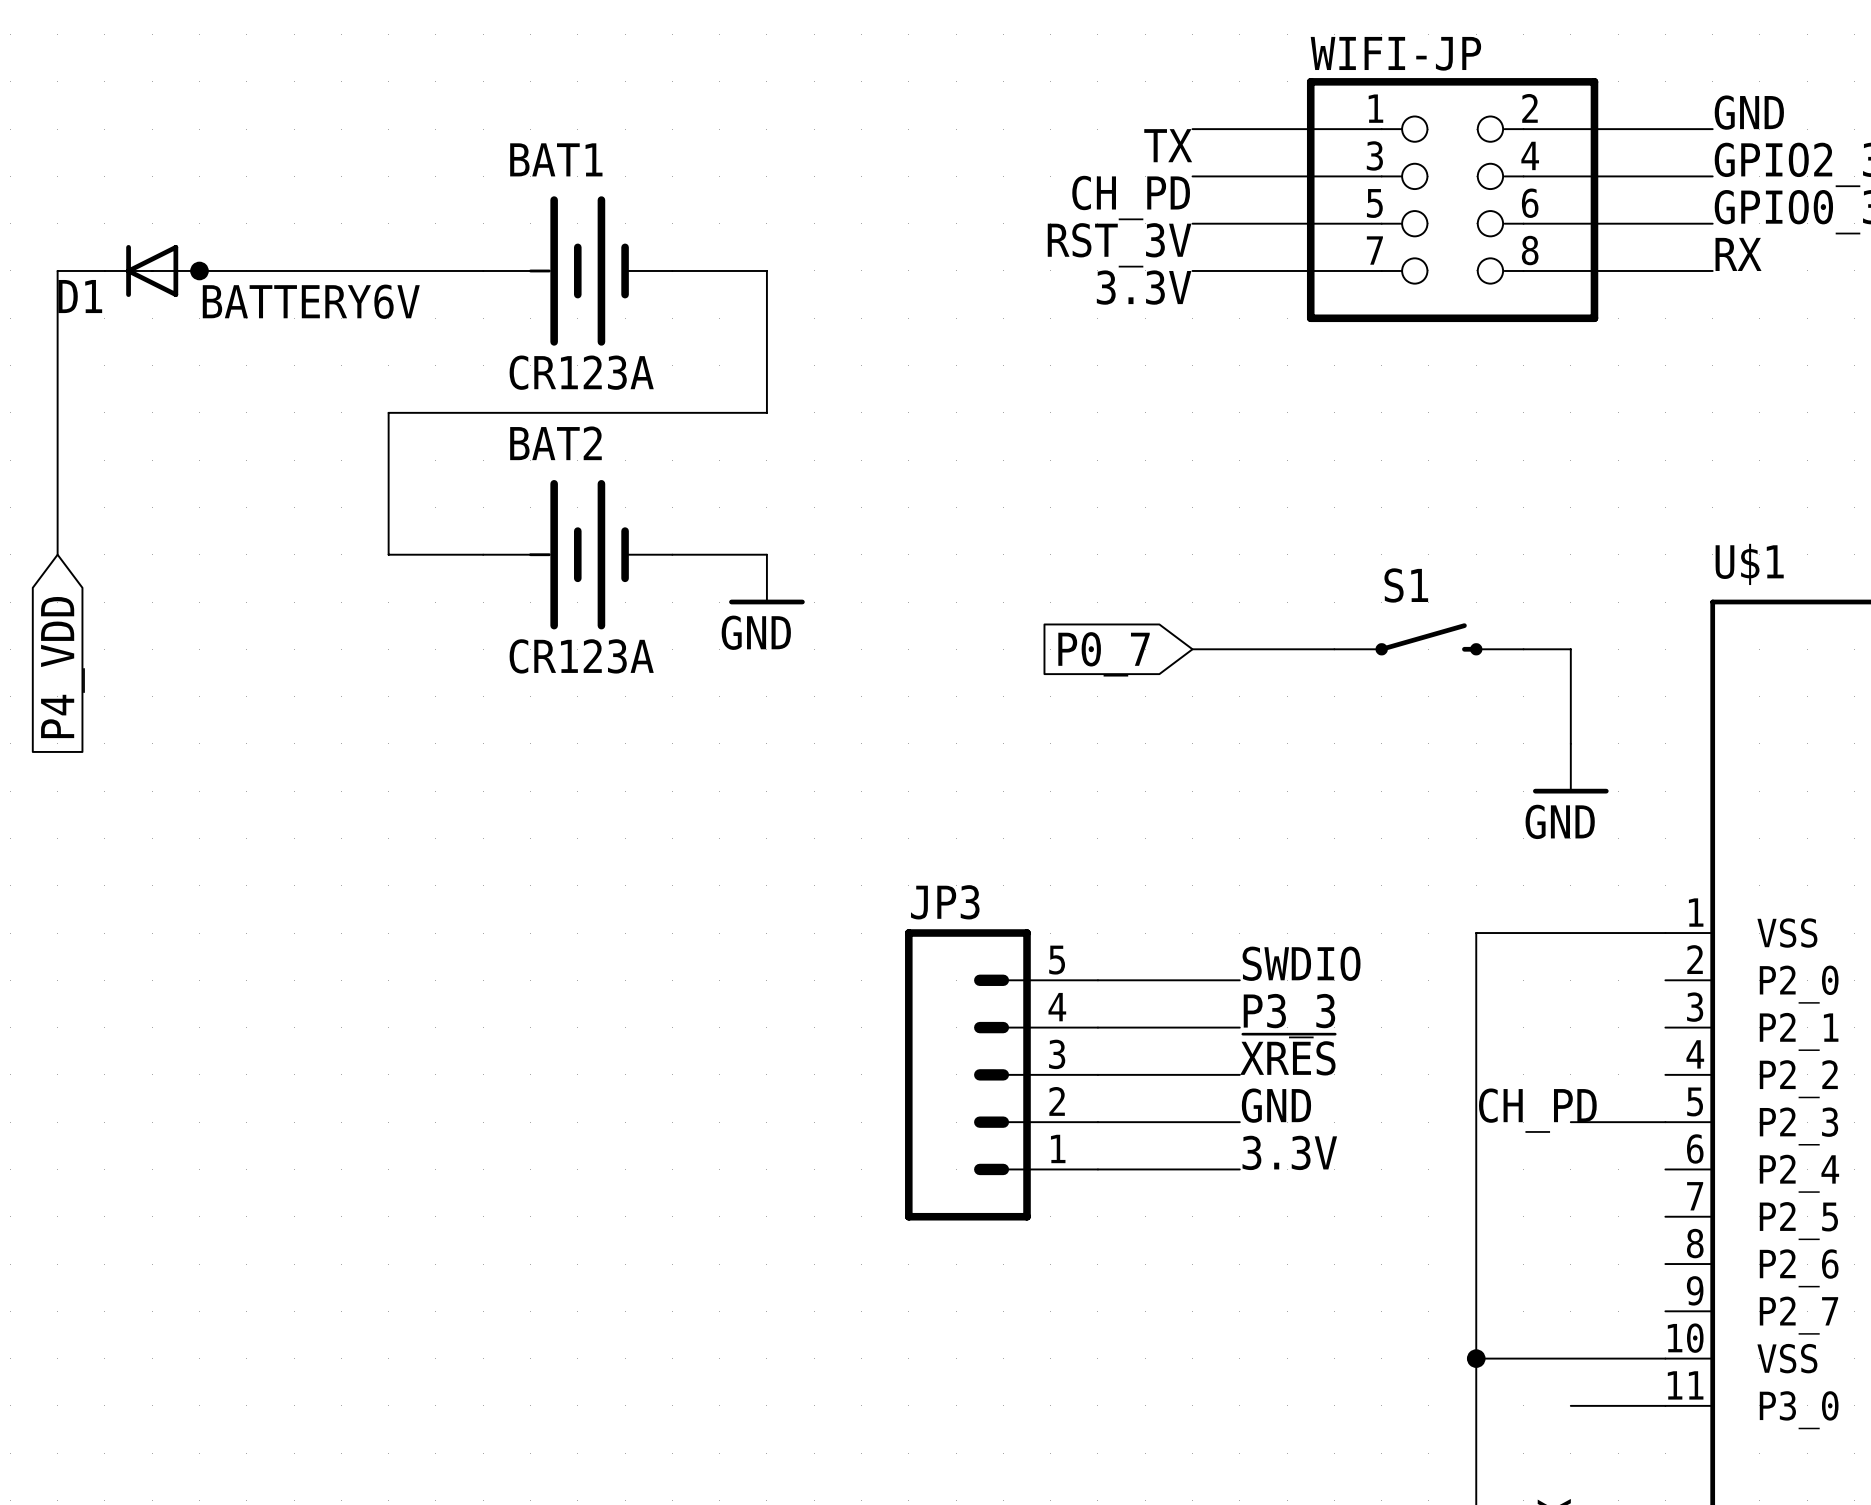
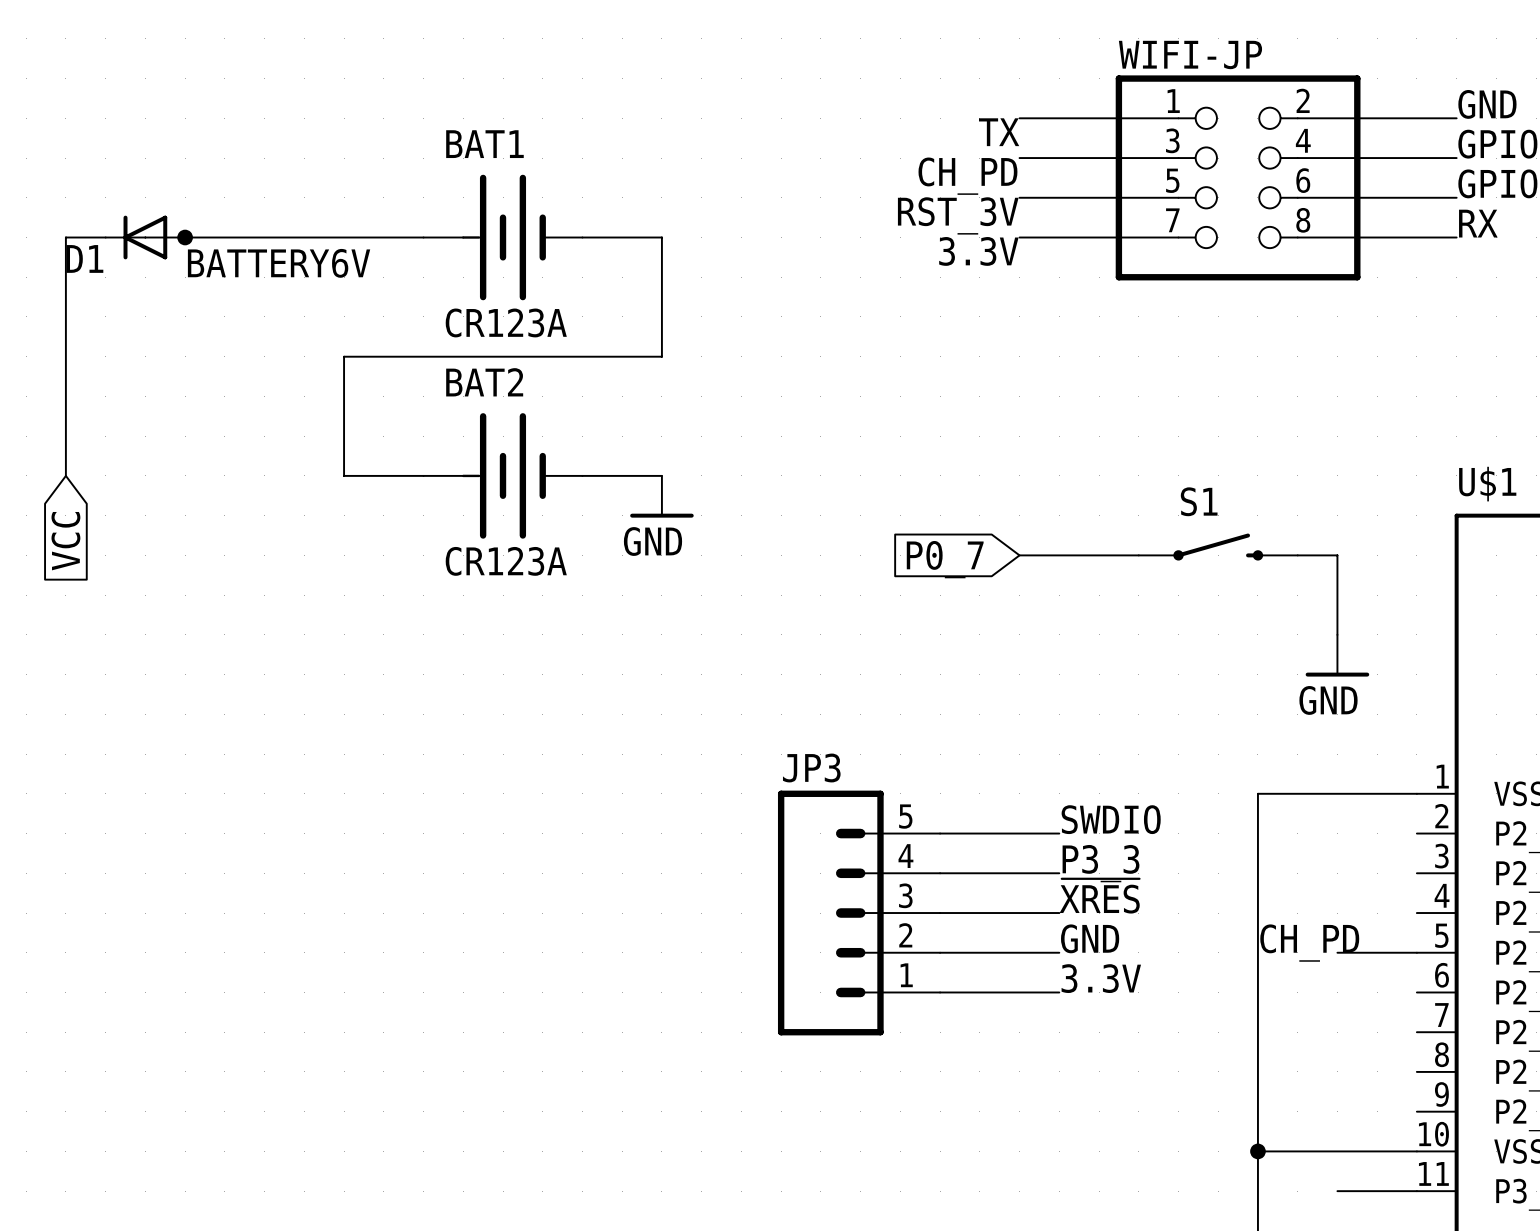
global label: P4_VDD (62, 667) -> VCC (65, 541)

